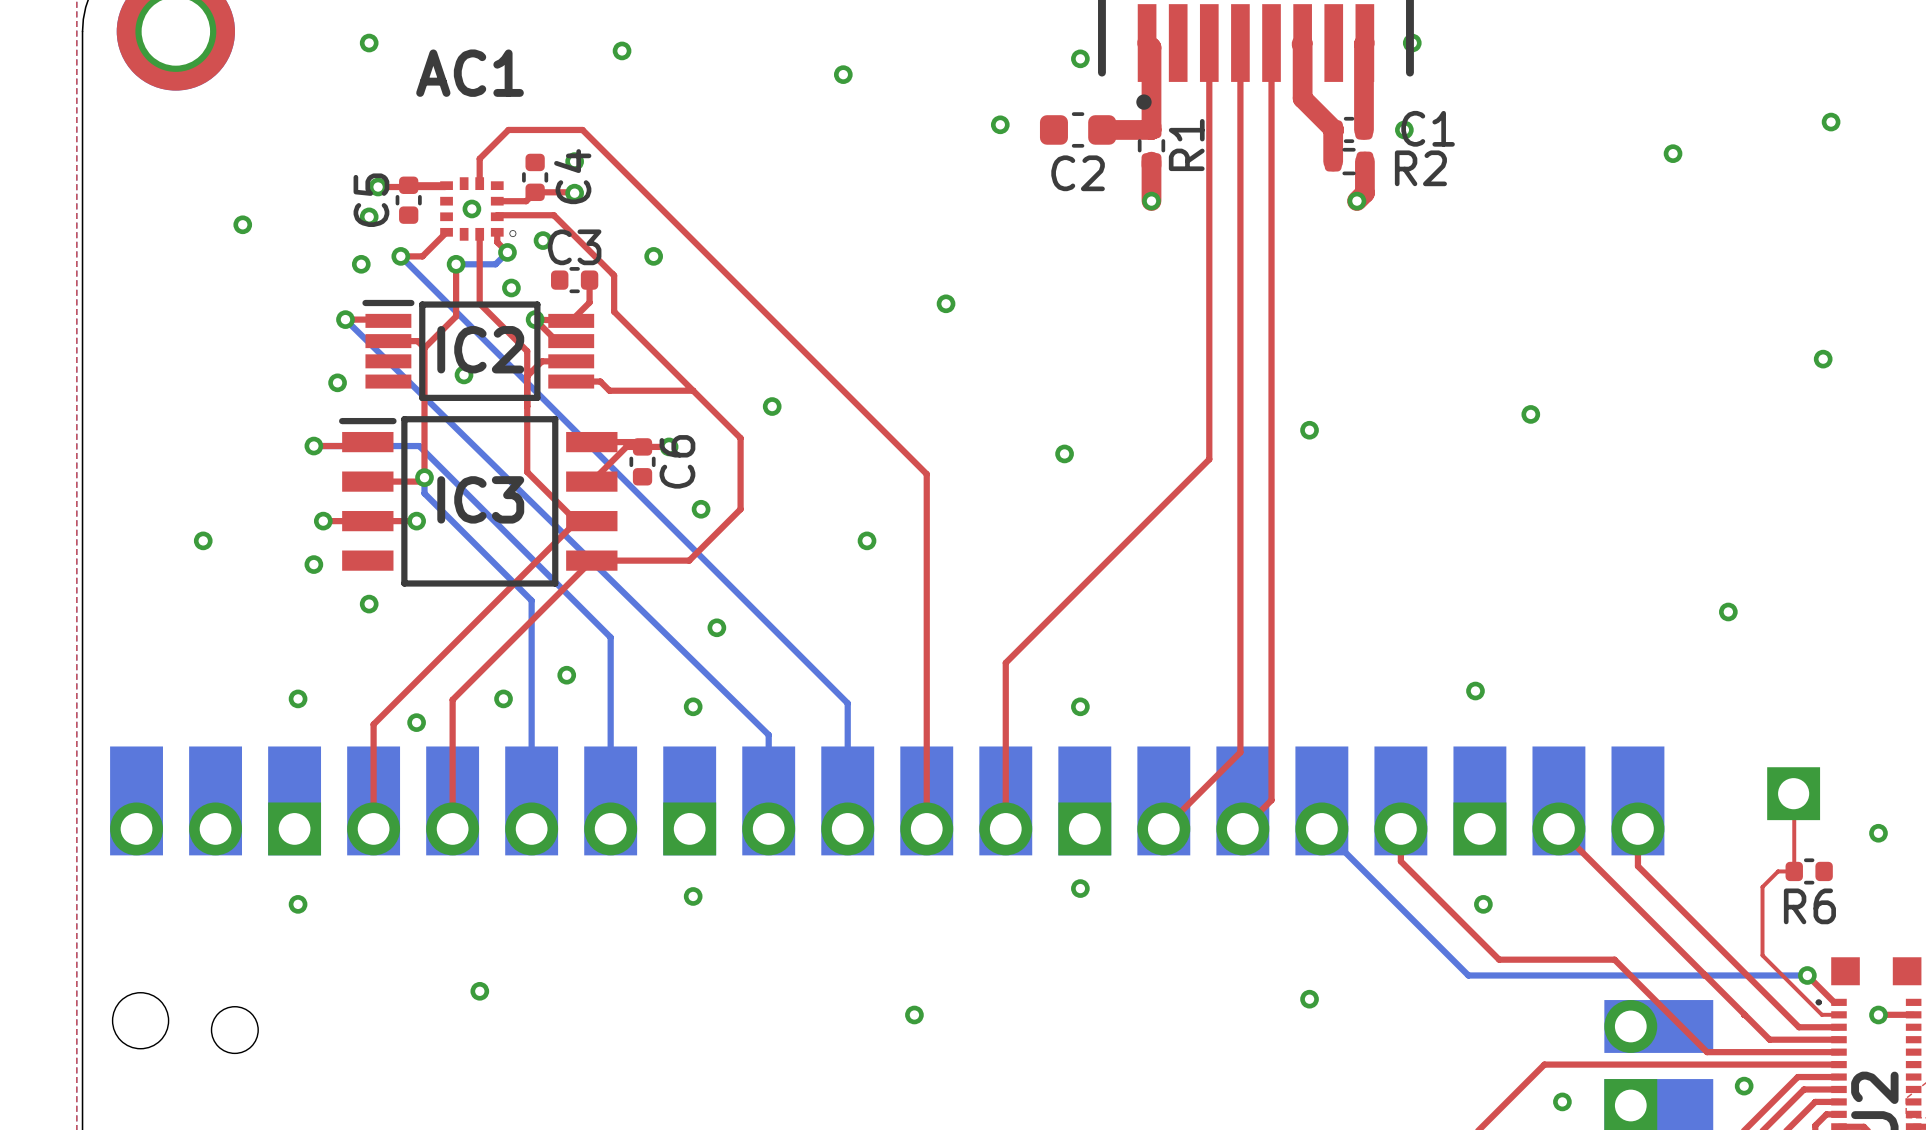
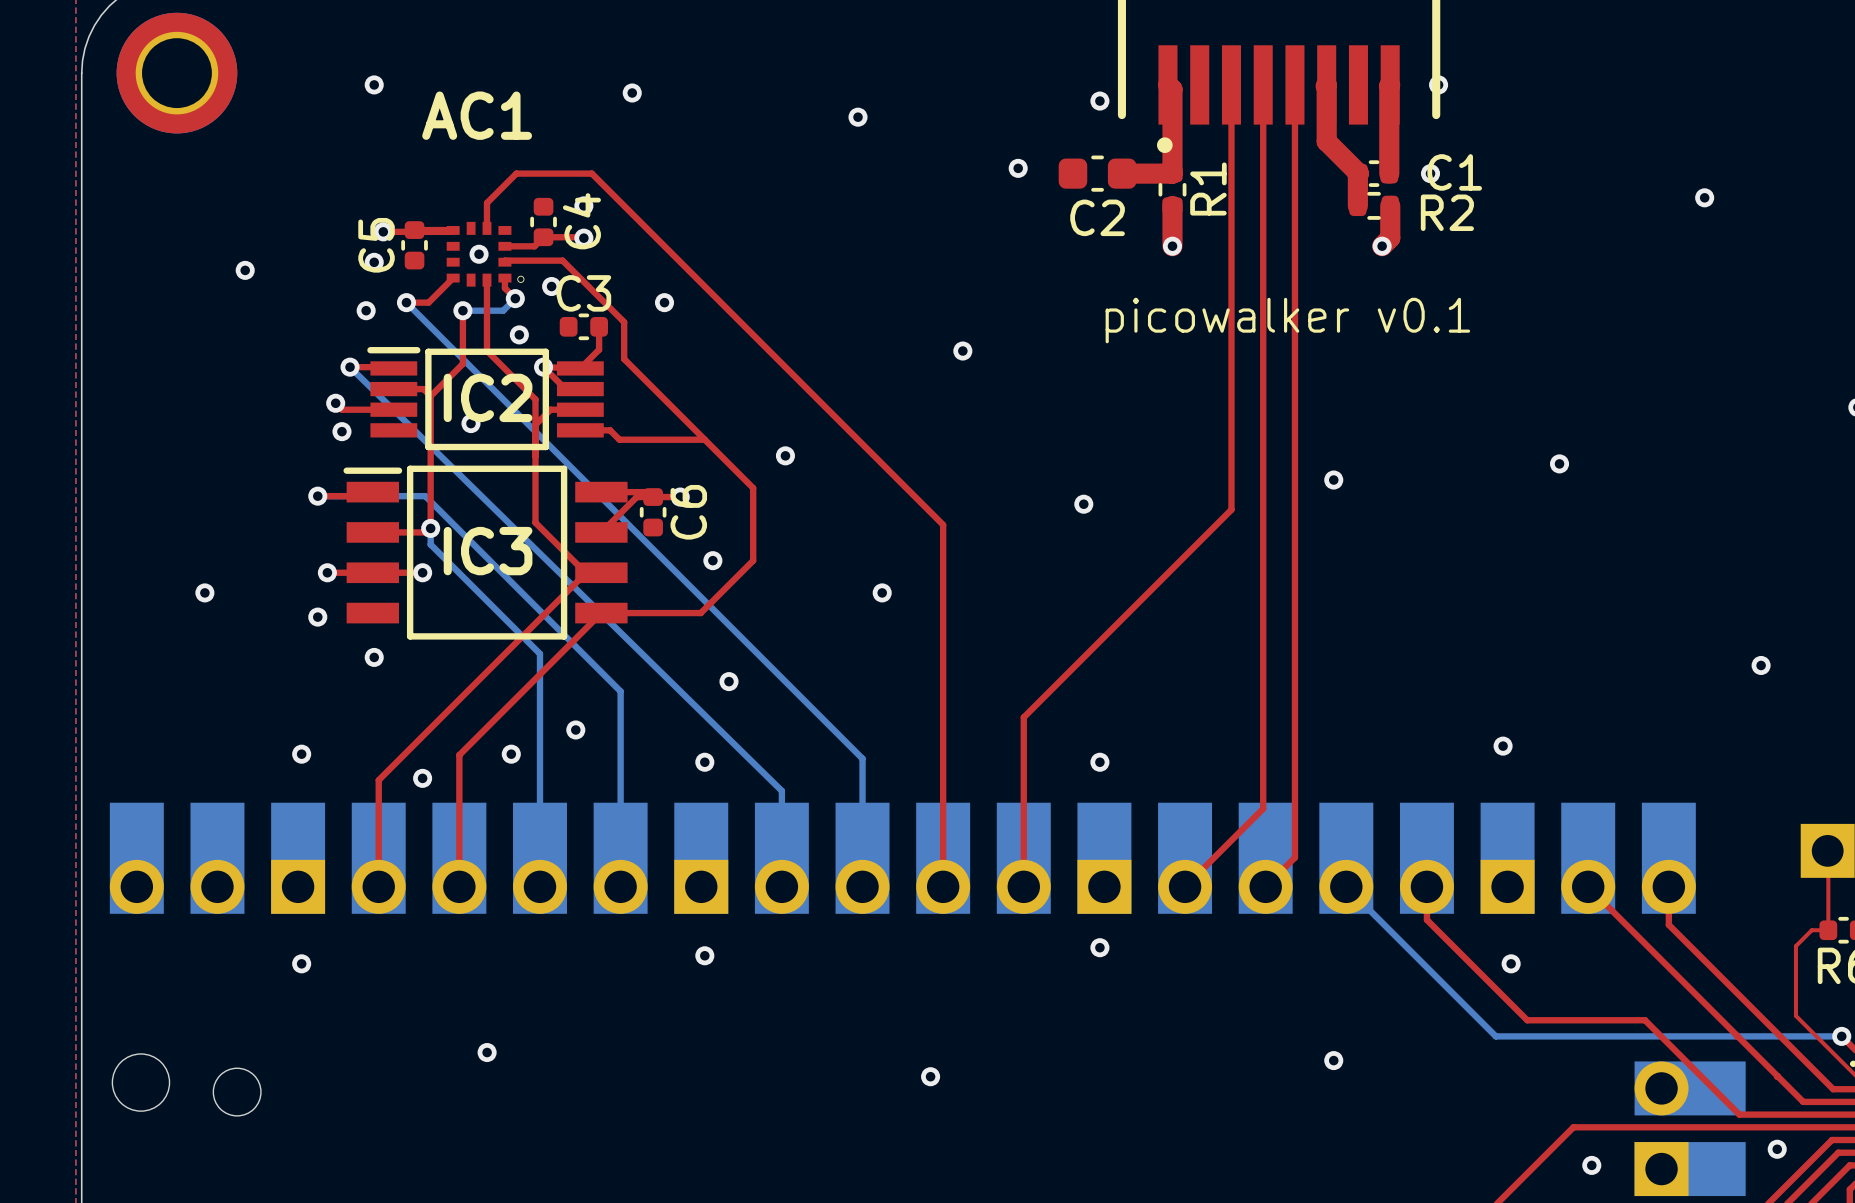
text: none -> picowalker v0.1 (1287, 320)
top track: none -> (335, 403) (342, 409) (393, 409)
via: none -> (335, 403)

